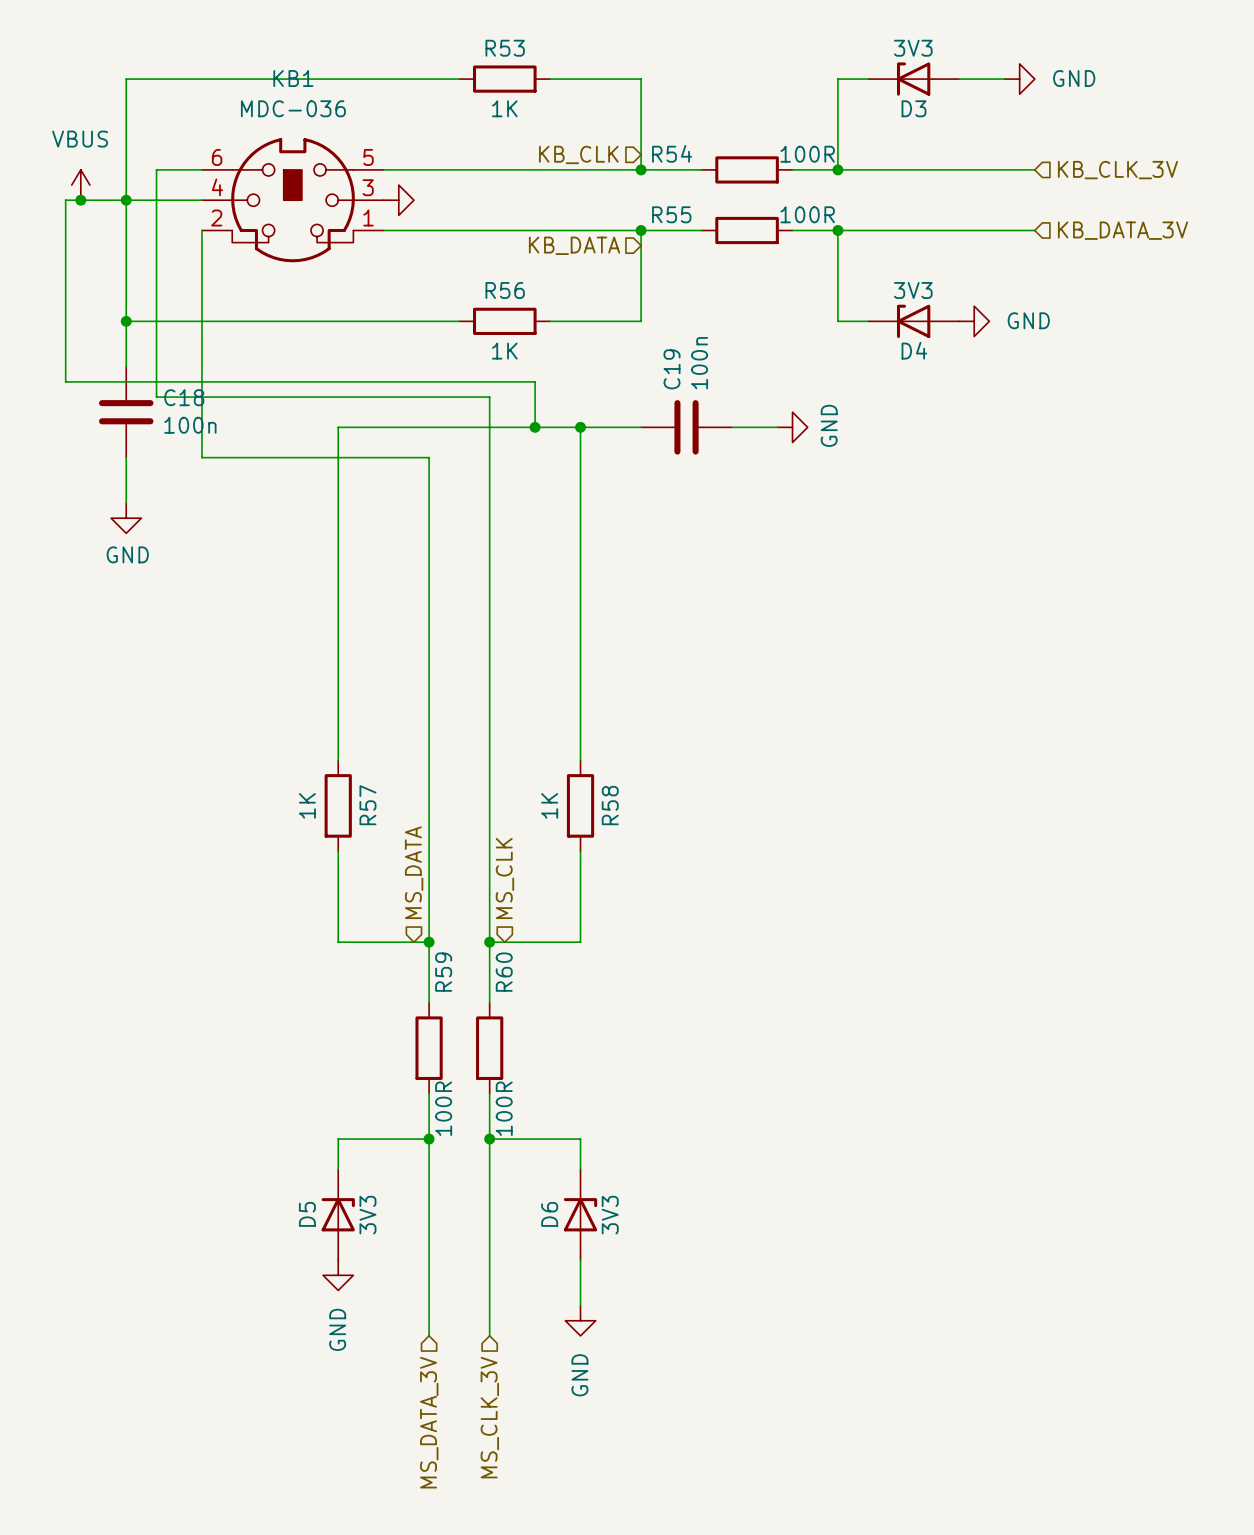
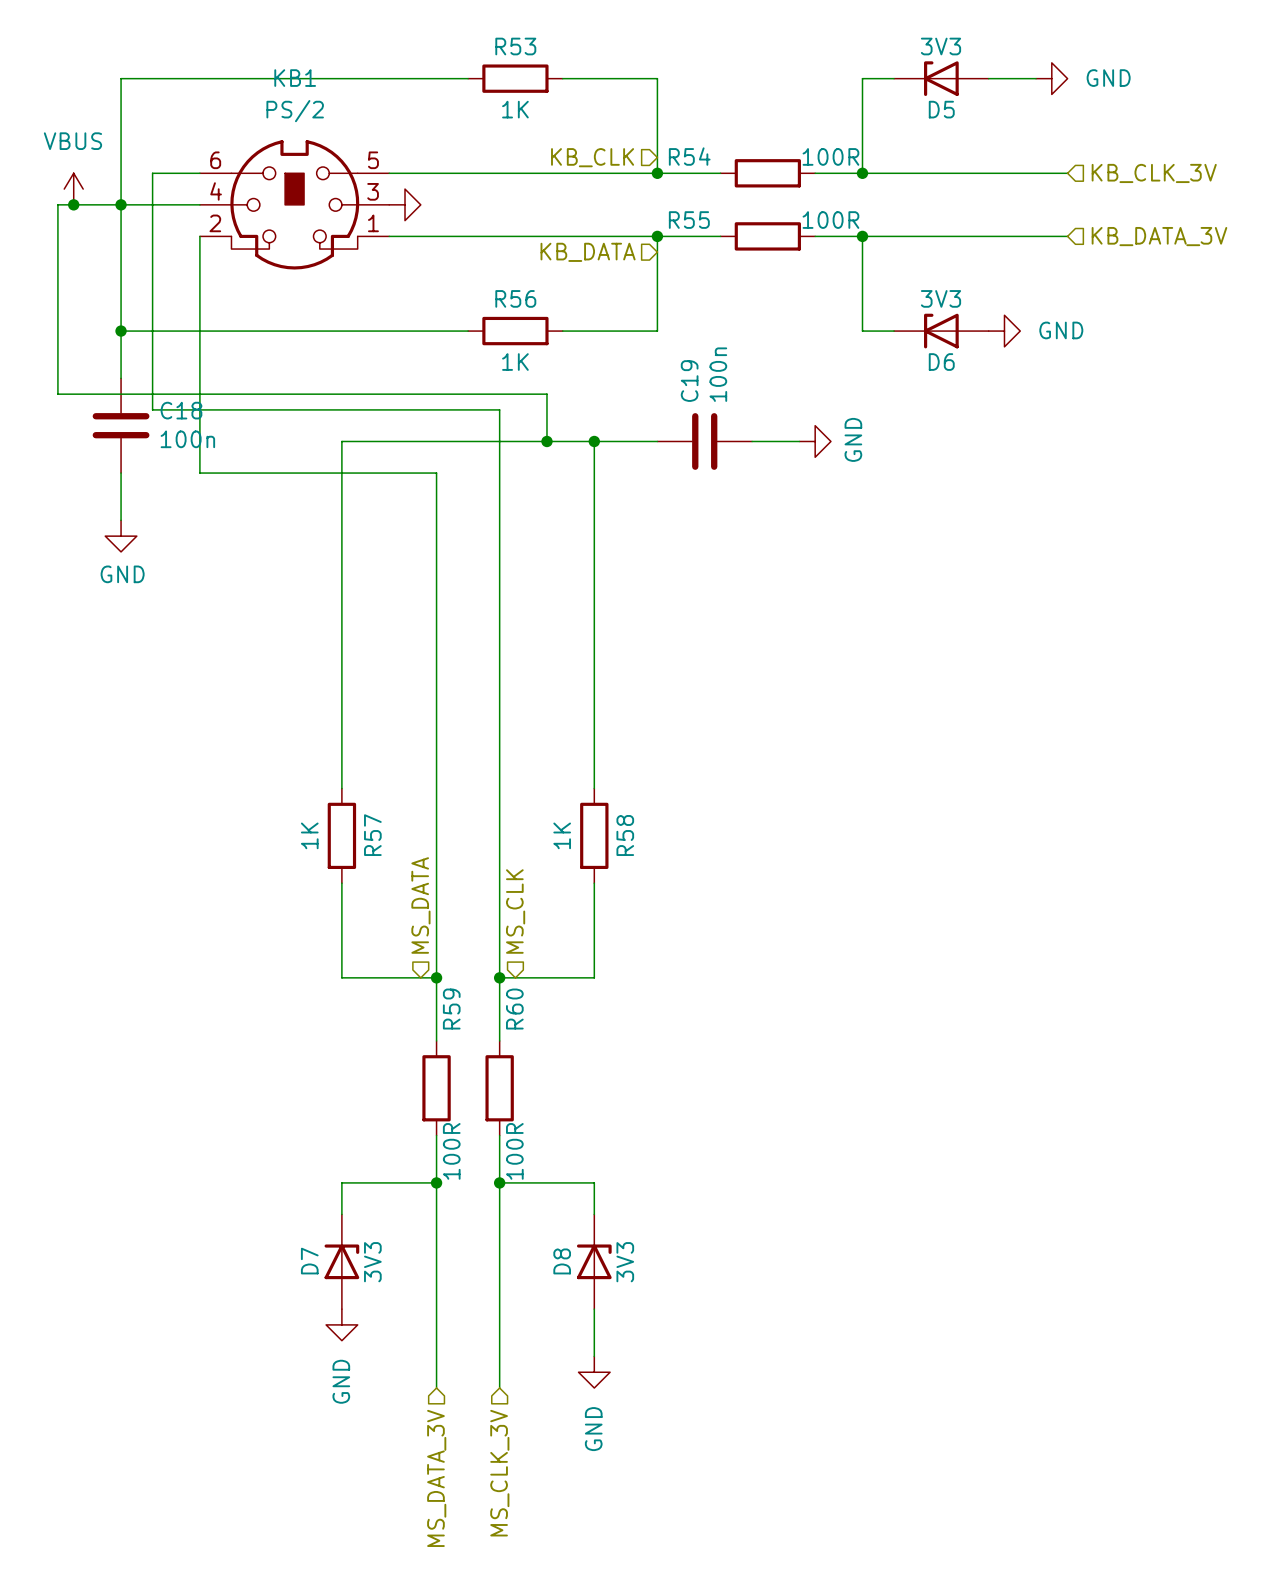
KB1 value: MDC-036 (293, 108) -> PS/2 (295, 111)
D3 name: D3 (914, 108) -> D5 (941, 109)
D4 name: D4 (914, 350) -> D6 (941, 362)
D5 name: D5 (307, 1214) -> D7 (309, 1261)
D6 name: D6 (549, 1214) -> D8 (562, 1261)

